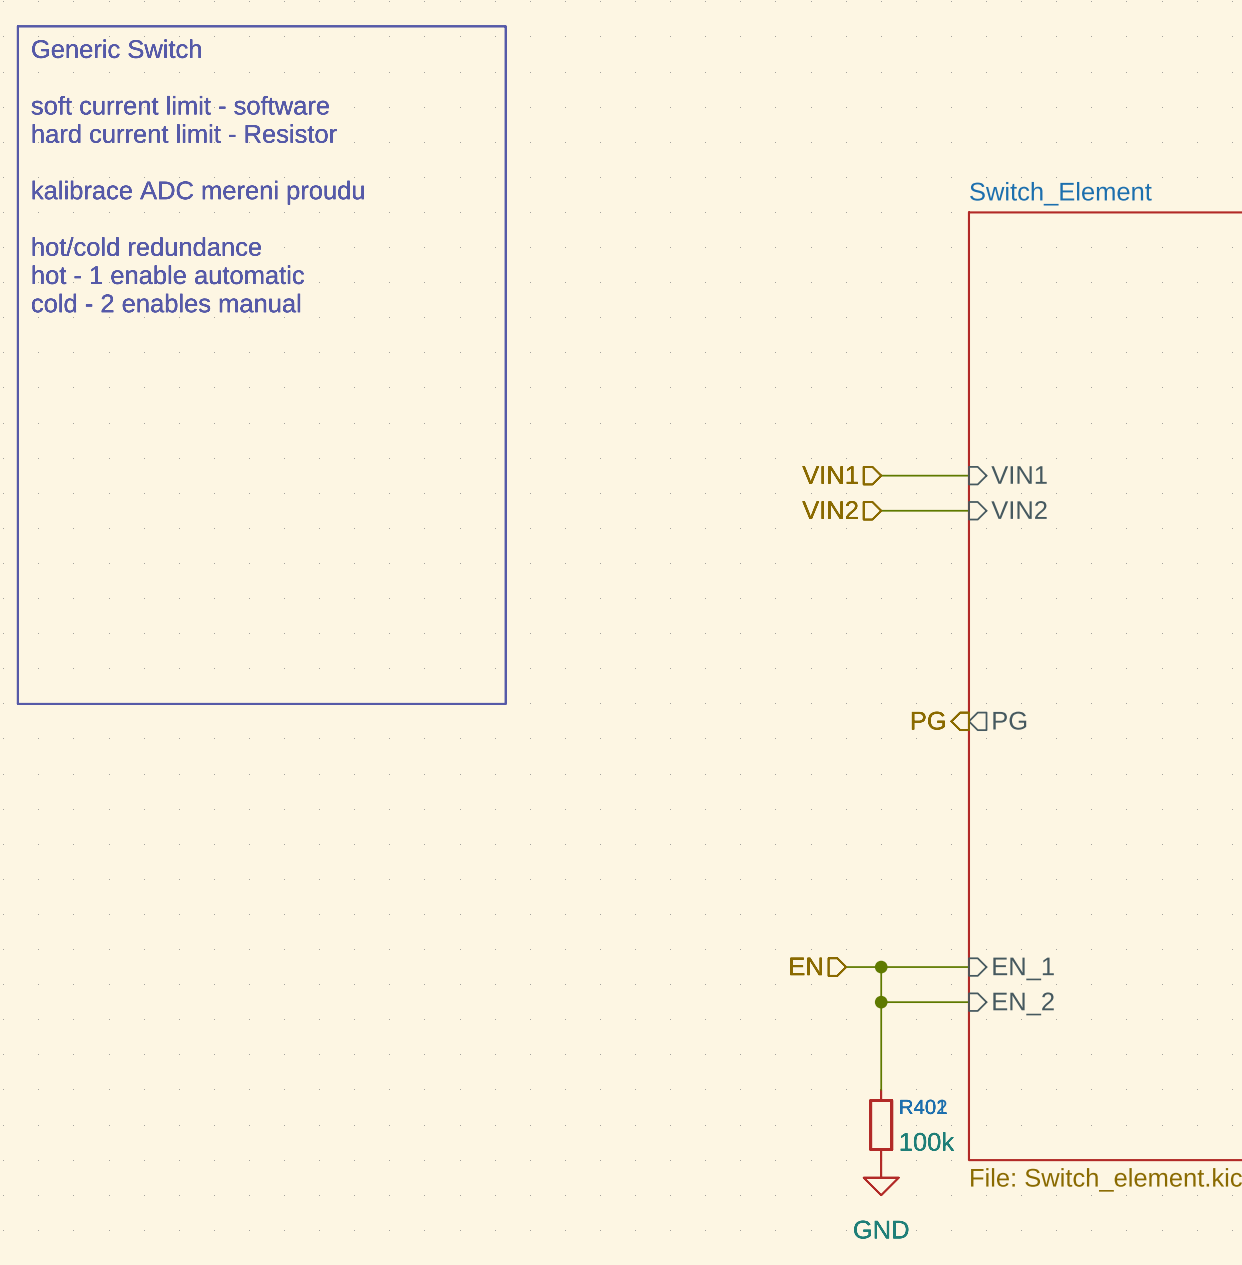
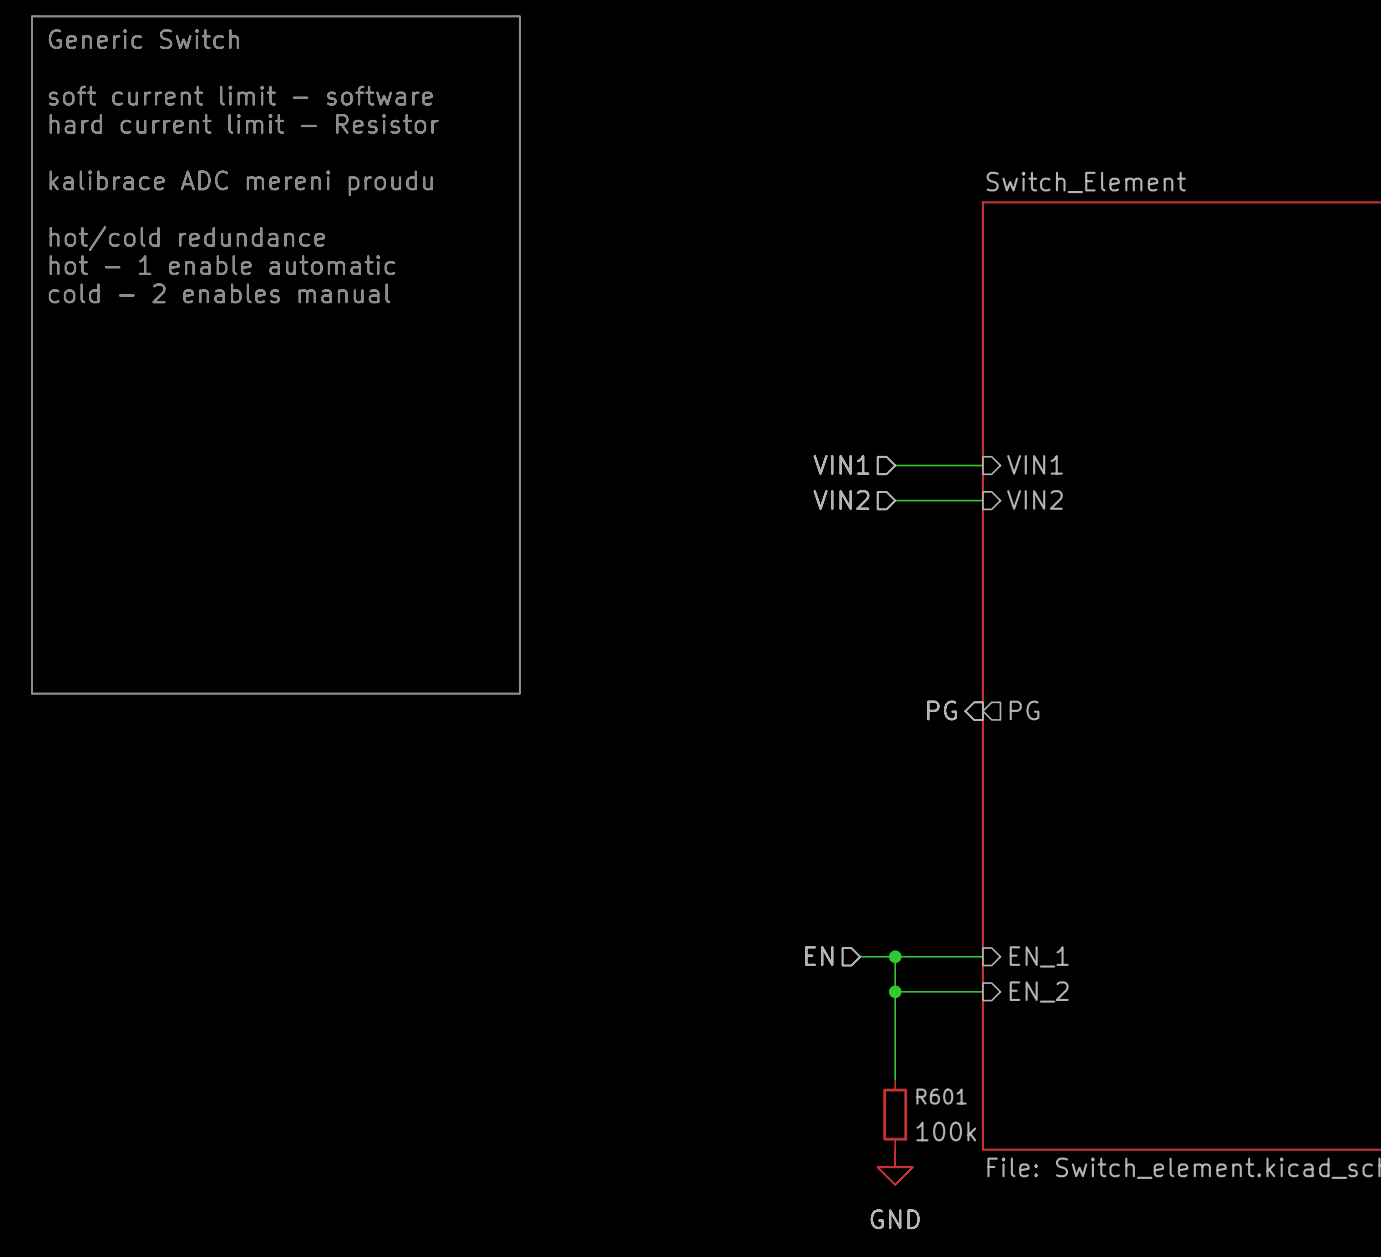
part: 100k (881, 1125) -> none
part: 100k (881, 1125) -> none
R601: none -> 100k (895, 1114)

